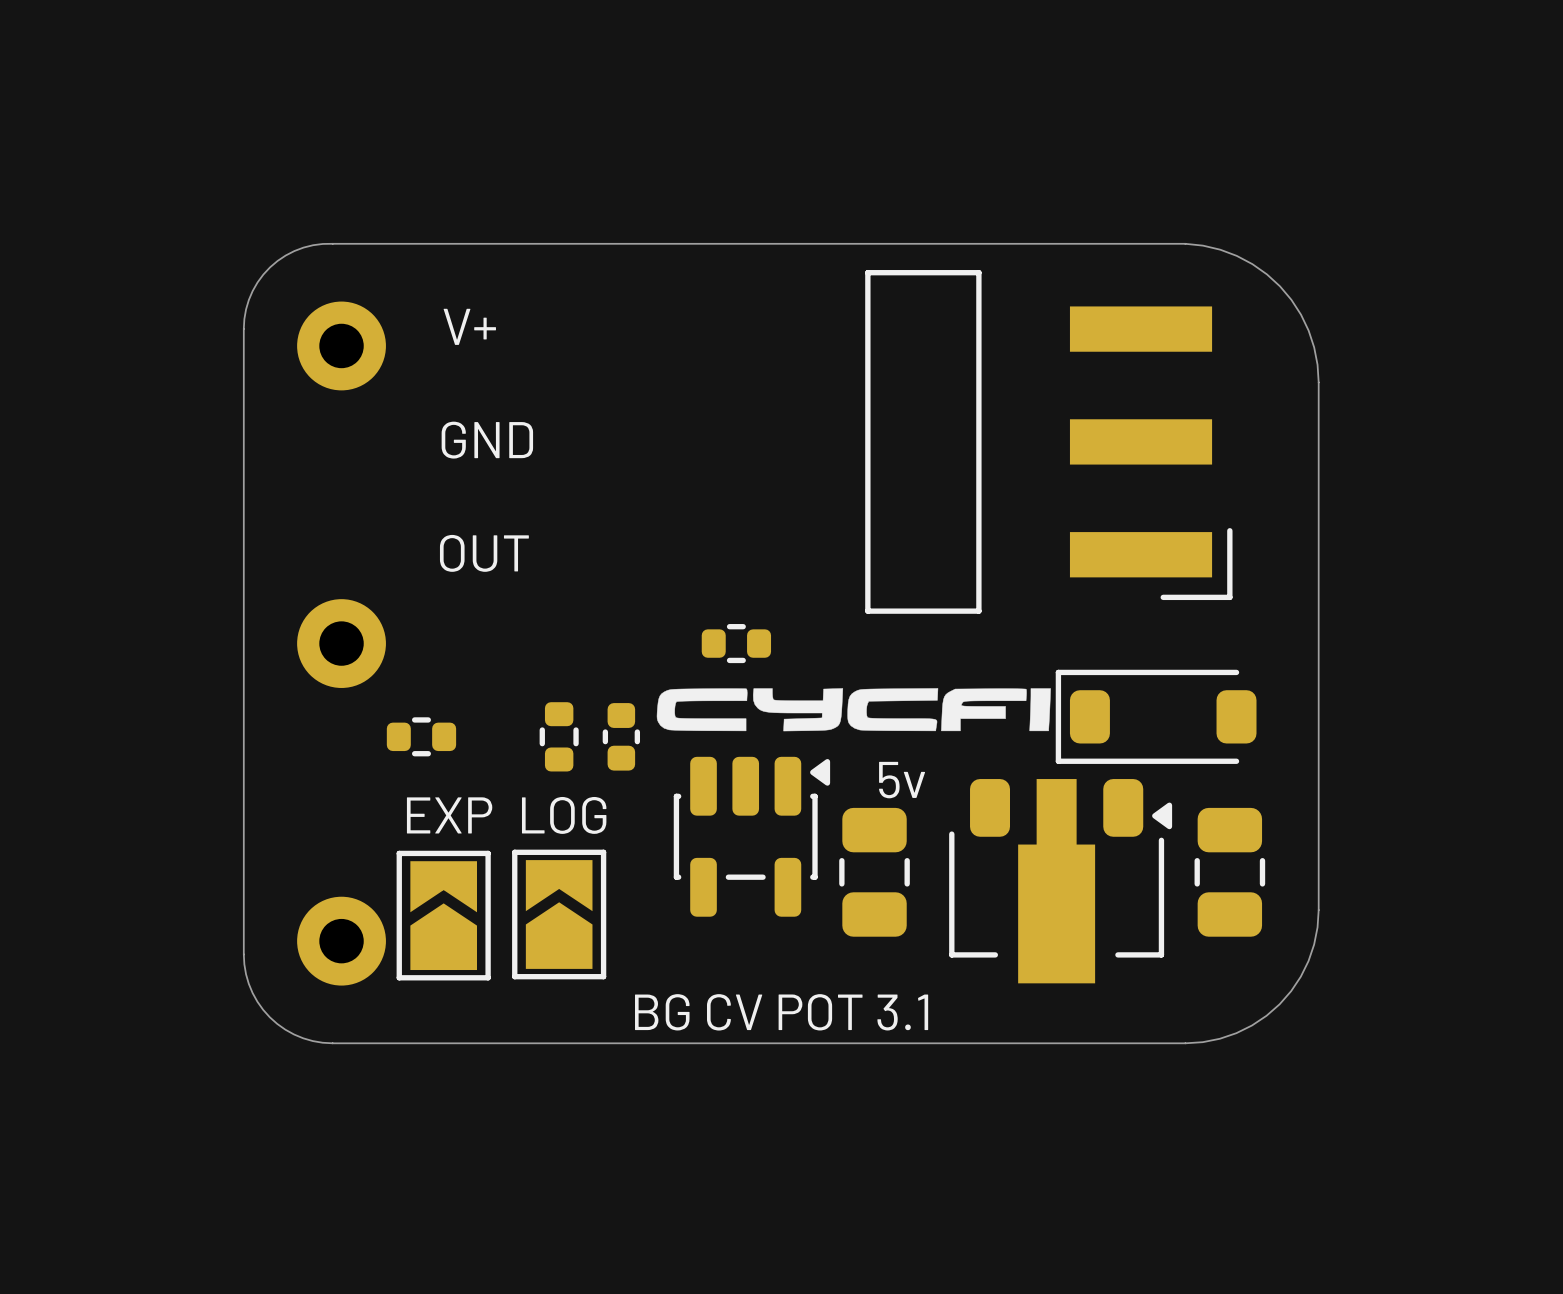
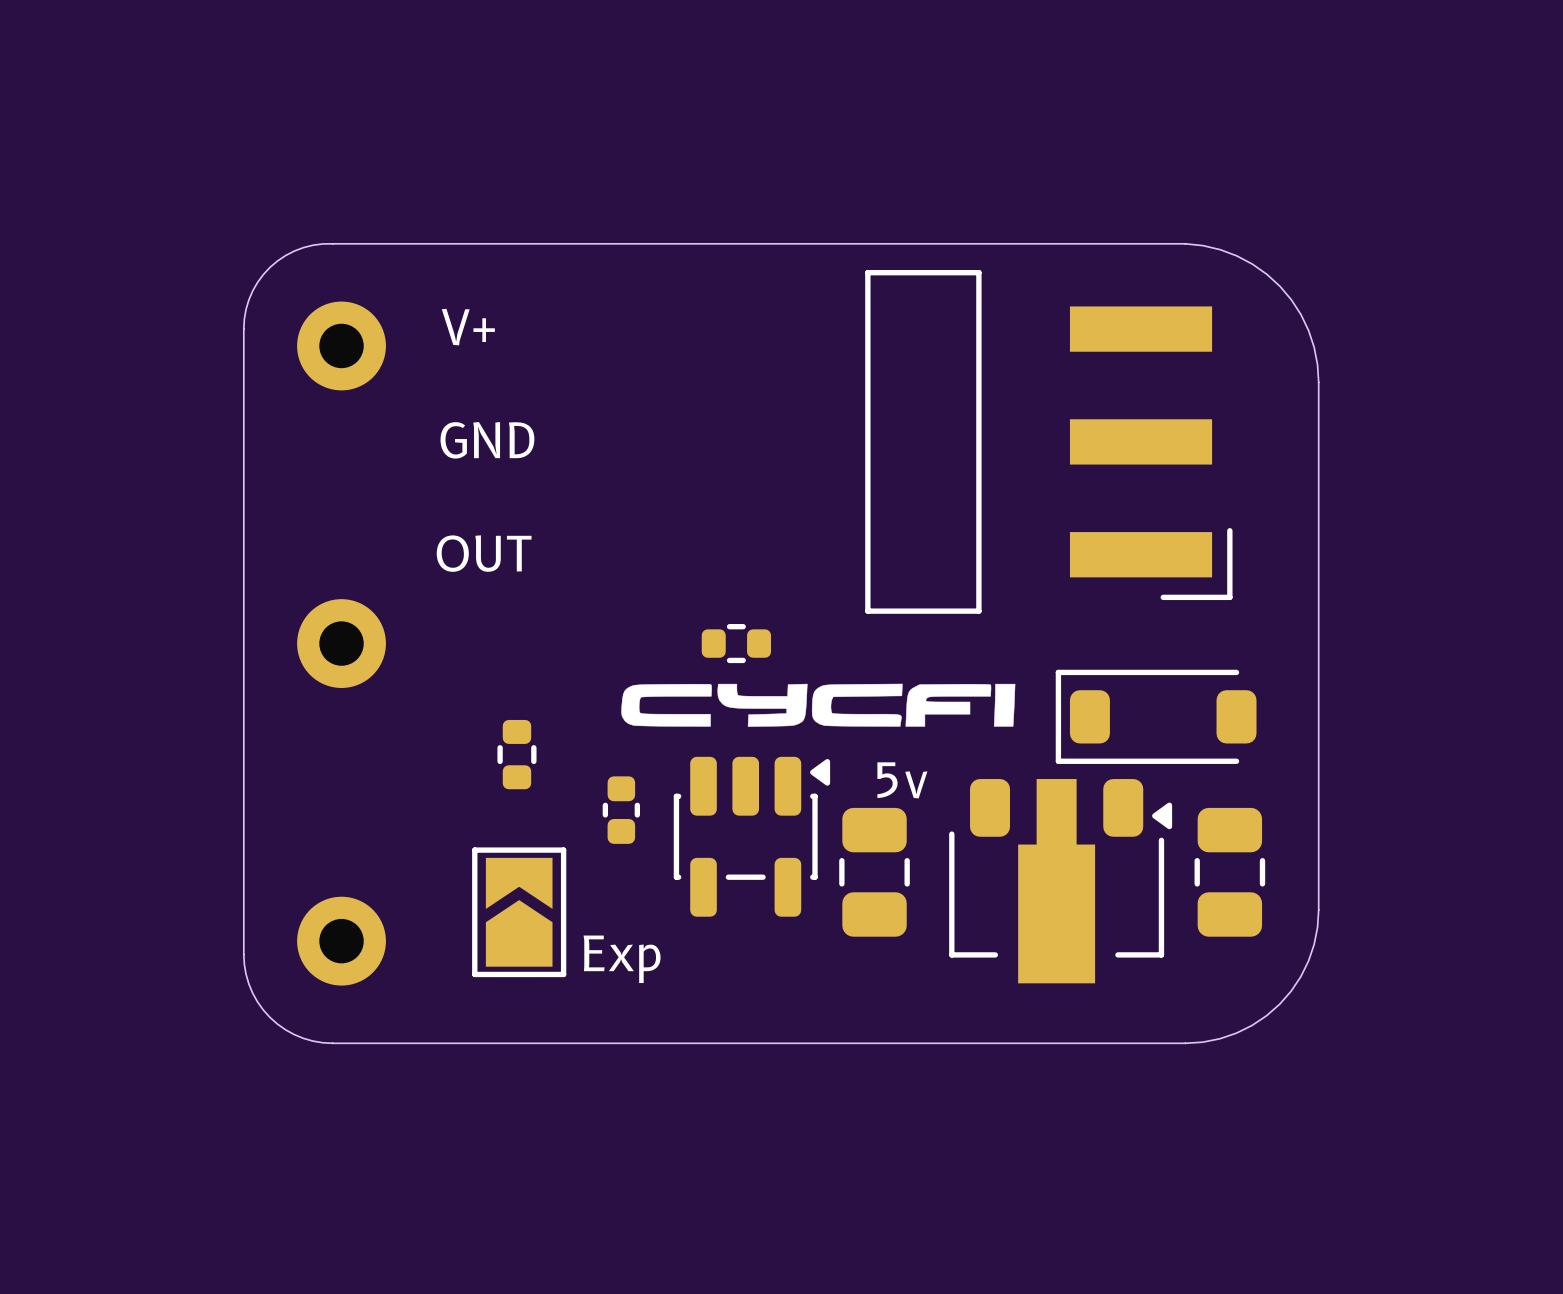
drawing position: (853, 709) -> (818, 705)
part: (421, 736) -> none
part position: (559, 736) -> (516, 754)
part position: (621, 736) -> (621, 810)
text: EXP (449, 815) -> none
text: LOG (564, 815) -> none
part: none -> (519, 912)
part: (559, 914) -> none
part: (443, 915) -> none
text: none -> Exp (622, 959)
text: BG CV POT 3.1 (781, 1012) -> none

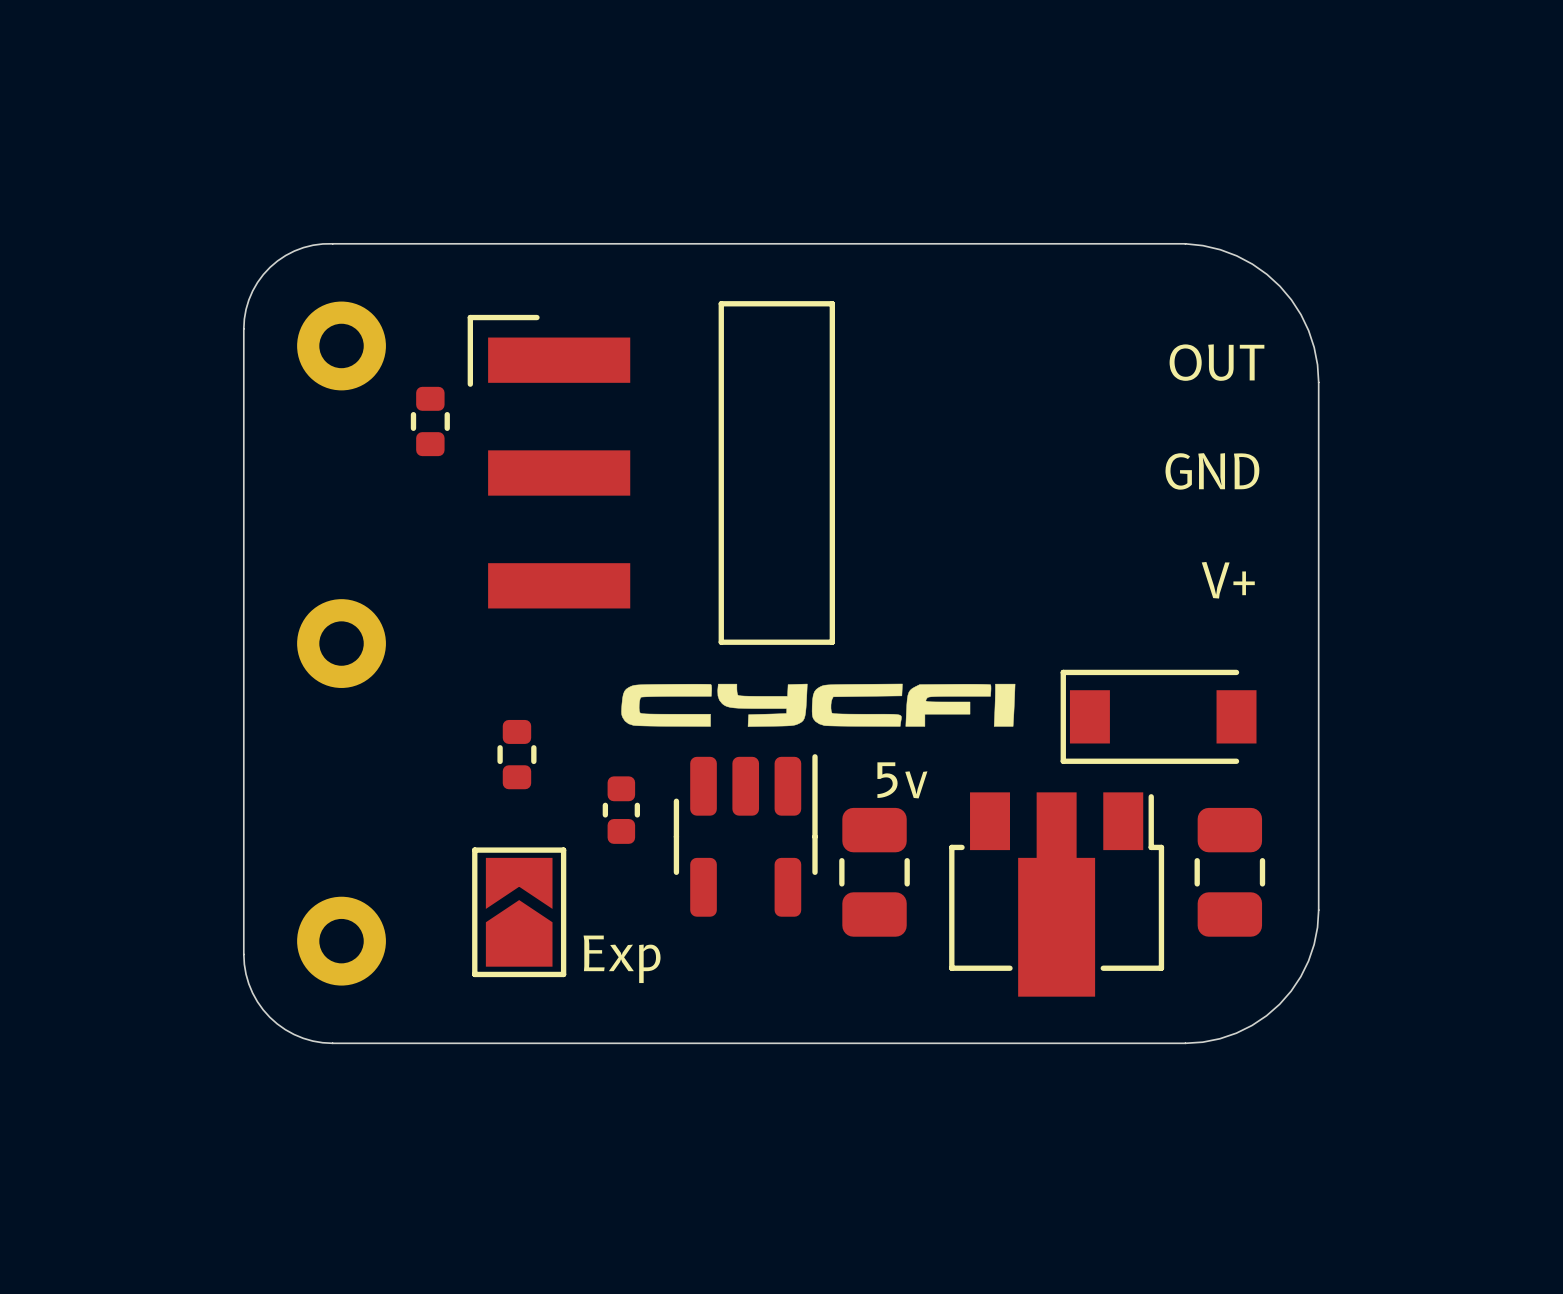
text position: V+ (468, 327) -> V+ (1228, 580)
text position: GND (487, 440) -> GND (1212, 471)
part rotation: 0° (1048, 441) -> 180° (651, 473)
part position: (1048, 441) -> (651, 473)
text position: OUT (484, 553) -> OUT (1216, 362)
part rotation: 0° (736, 643) -> 90° clockwise (430, 421)
part position: (736, 643) -> (430, 421)
part footprint: [1055, 669, 1257, 764] -> [1060, 669, 1257, 764]
part footprint: [673, 756, 831, 917] -> [673, 754, 818, 917]
part footprint: [949, 779, 1173, 984] -> [949, 792, 1165, 997]

